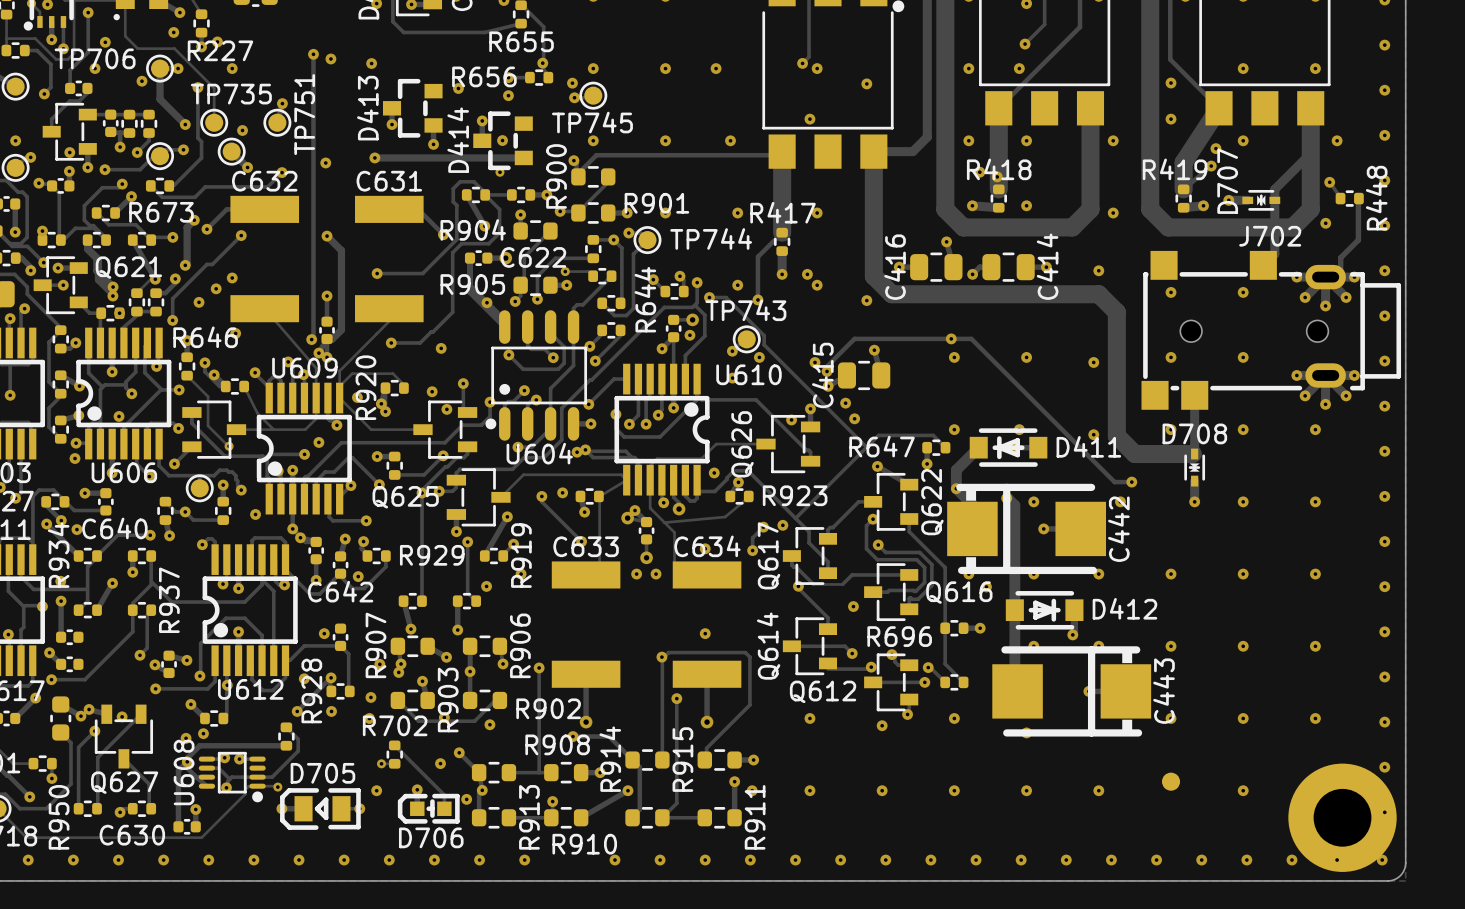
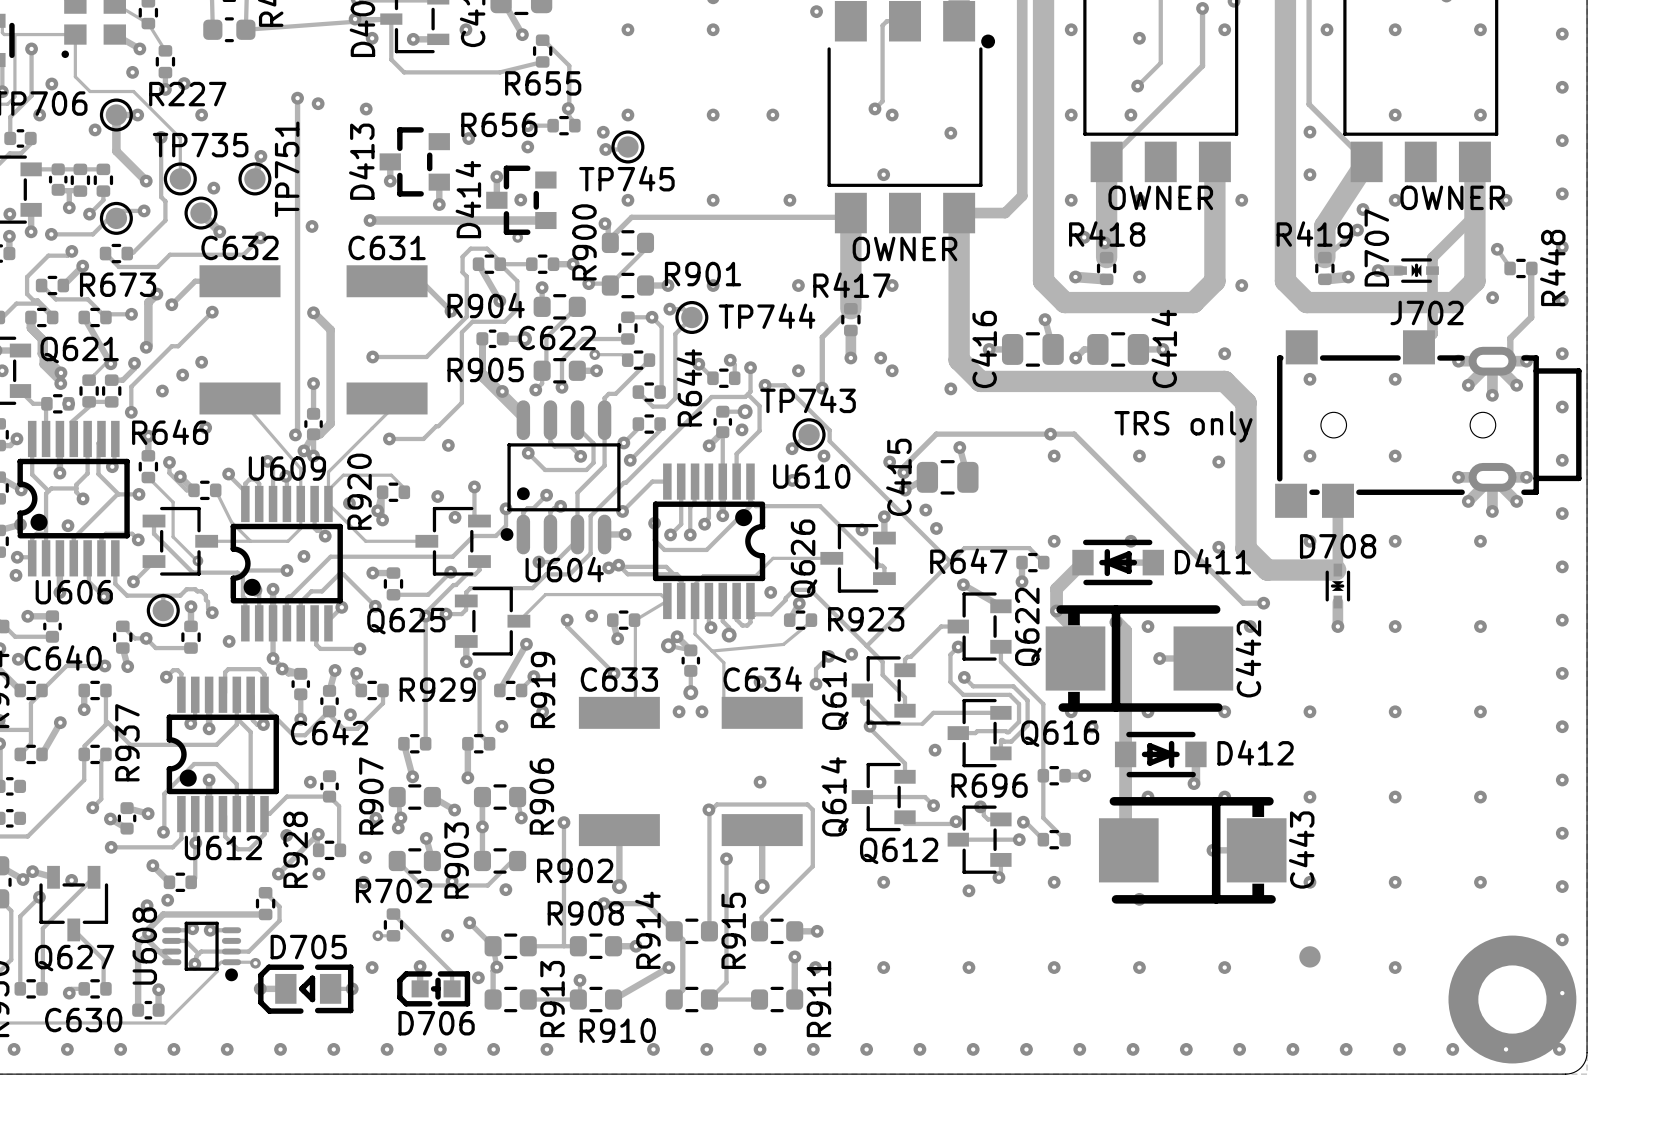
text: none -> OWNER (1160, 197)
text: none -> OWNER (1452, 197)
text: none -> OWNER (905, 249)
text: none -> TRS only (1183, 426)

